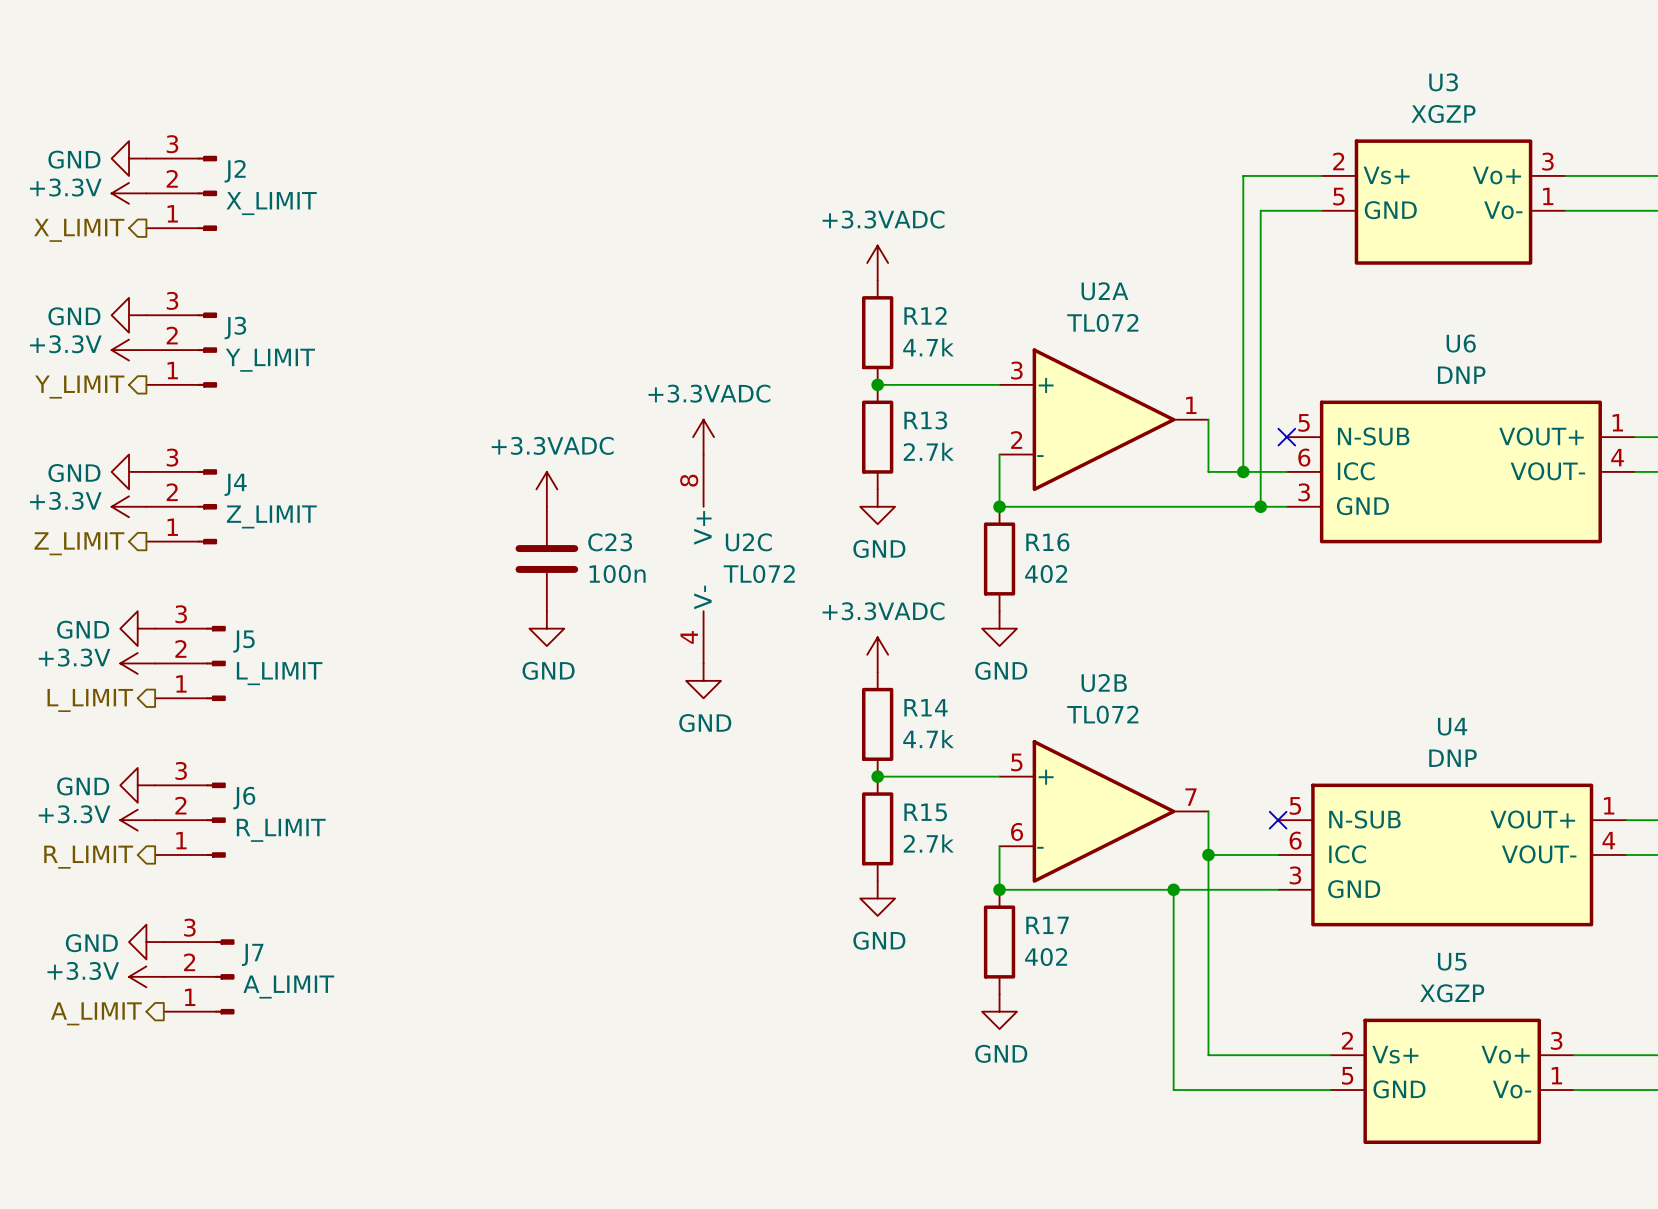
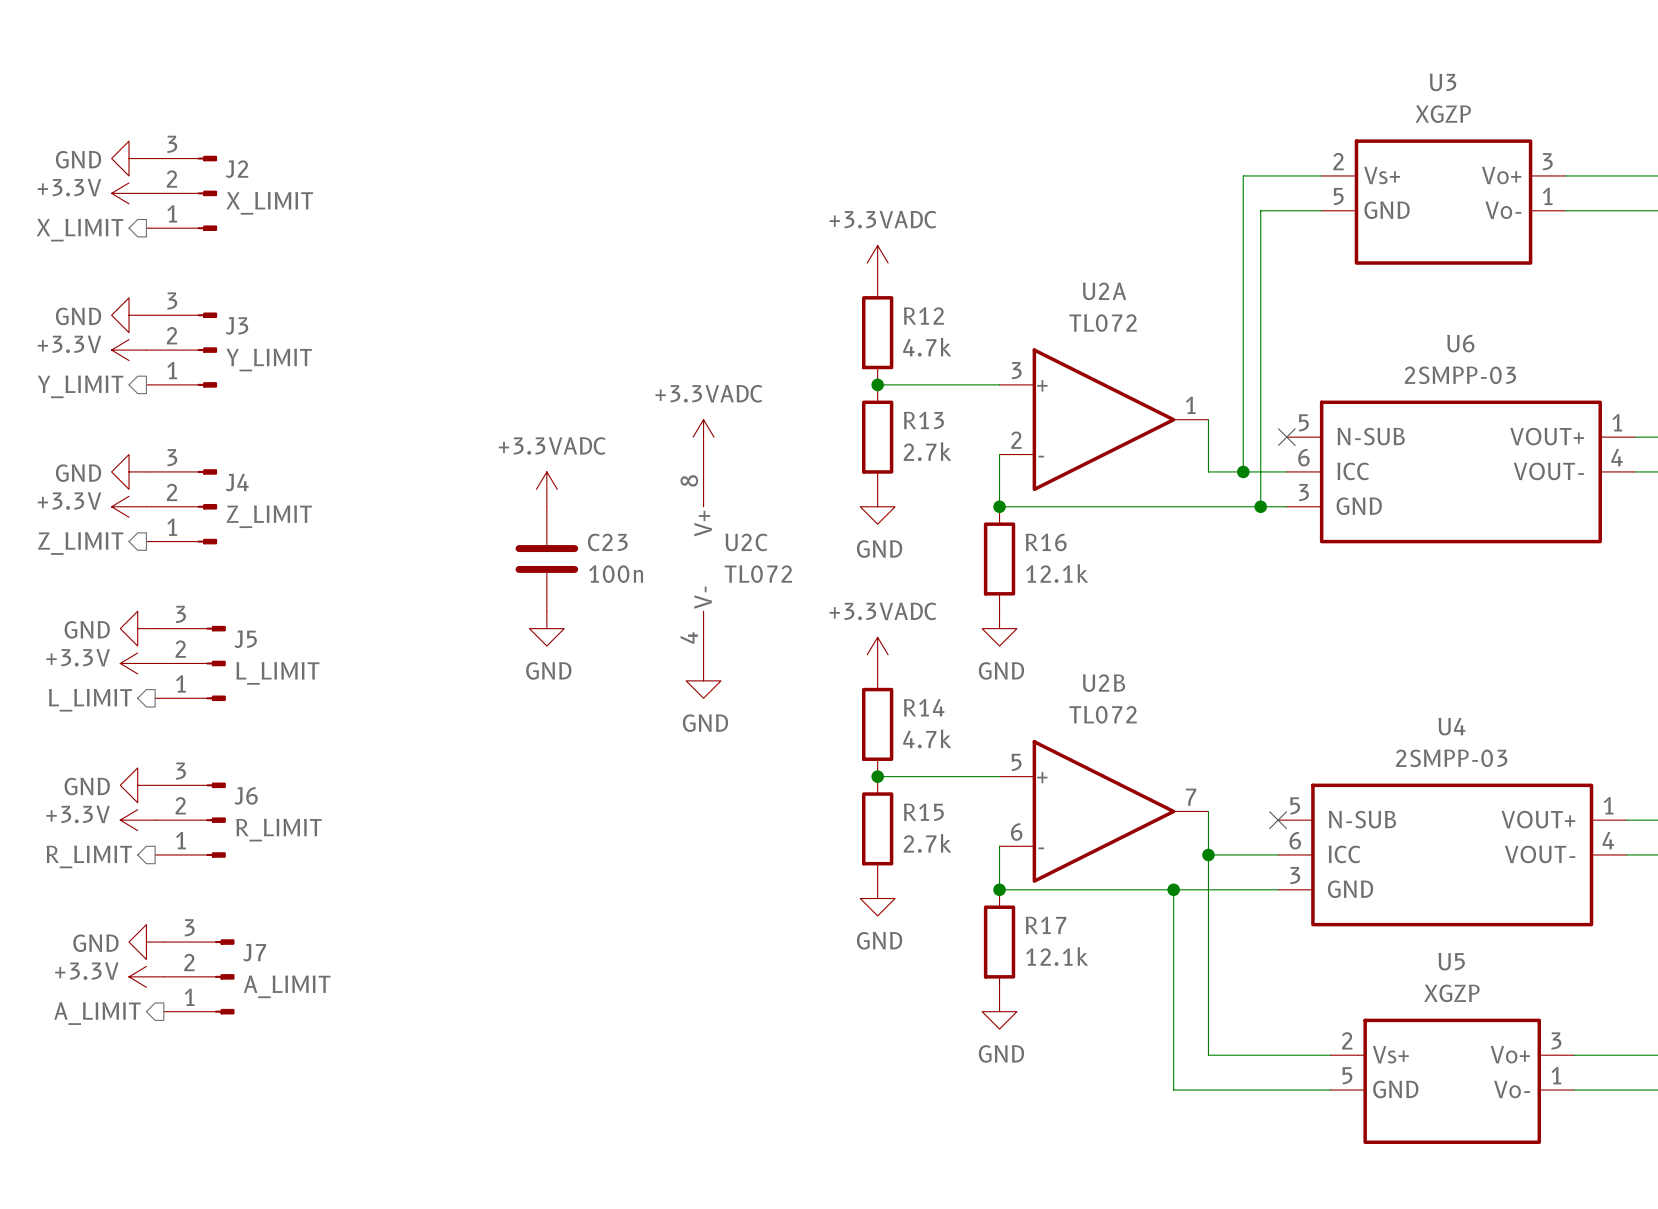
U6 value: DNP (1461, 375) -> 2SMPP-03 (1460, 375)
R16 value: 402 (1046, 574) -> 12.1k (1057, 573)
U4 value: DNP (1452, 758) -> 2SMPP-03 (1451, 758)
R17 value: 402 (1046, 957) -> 12.1k (1057, 956)

